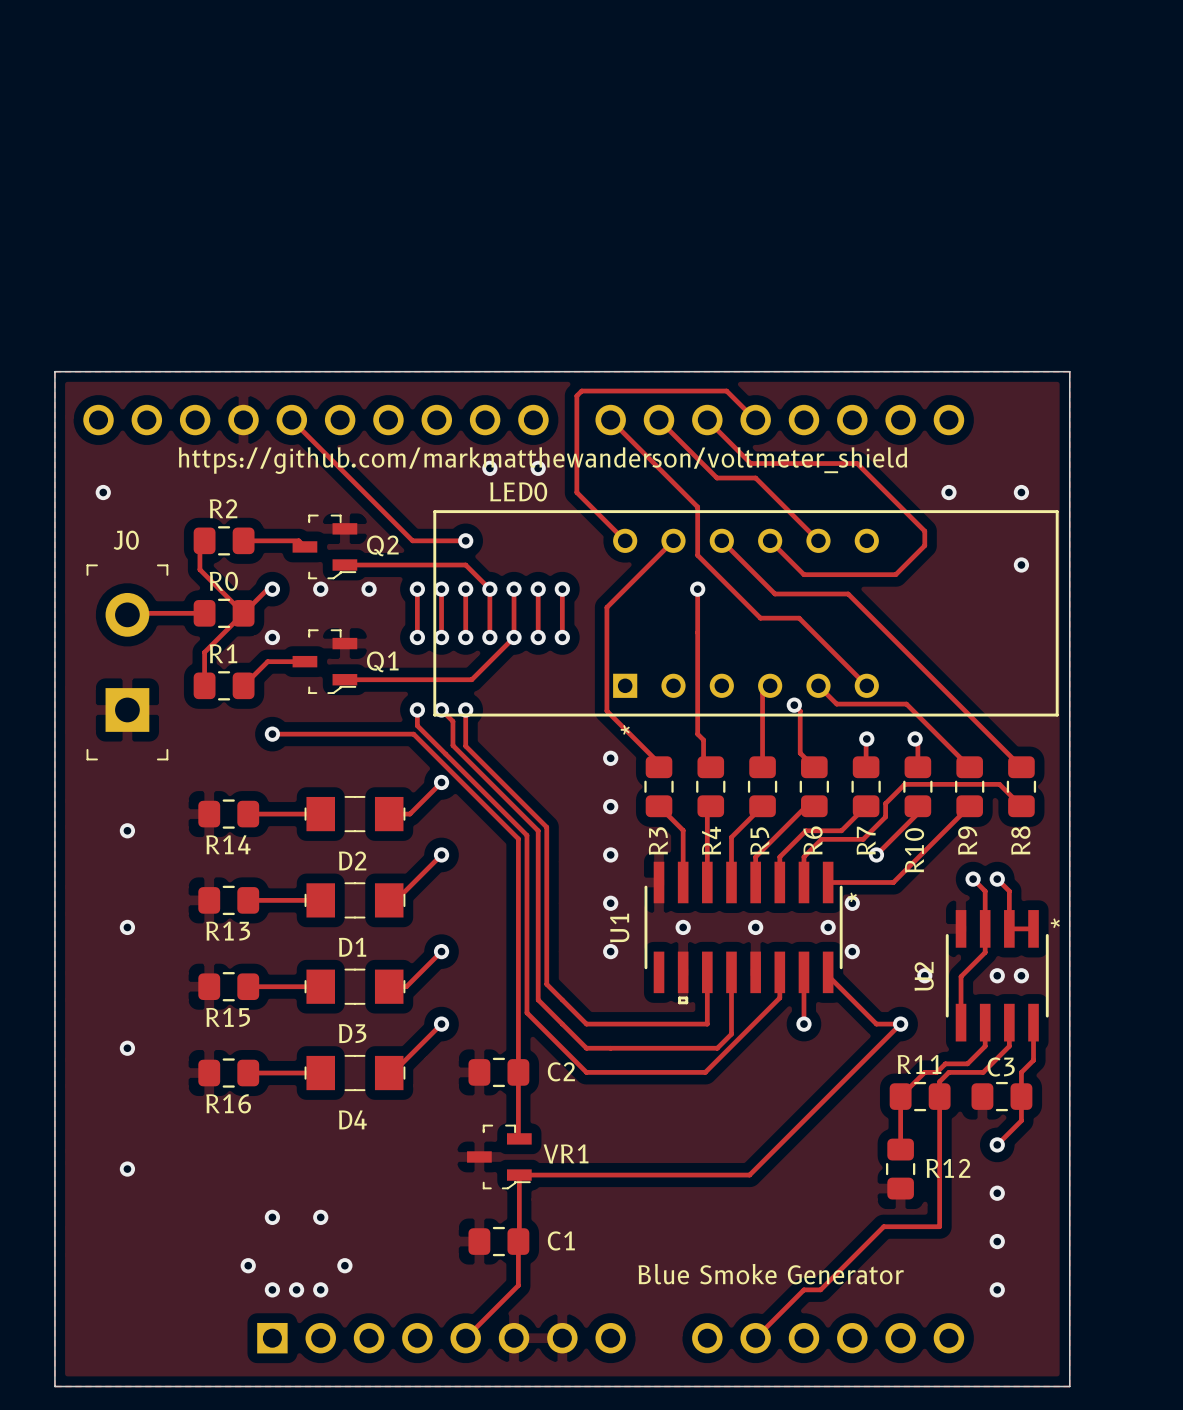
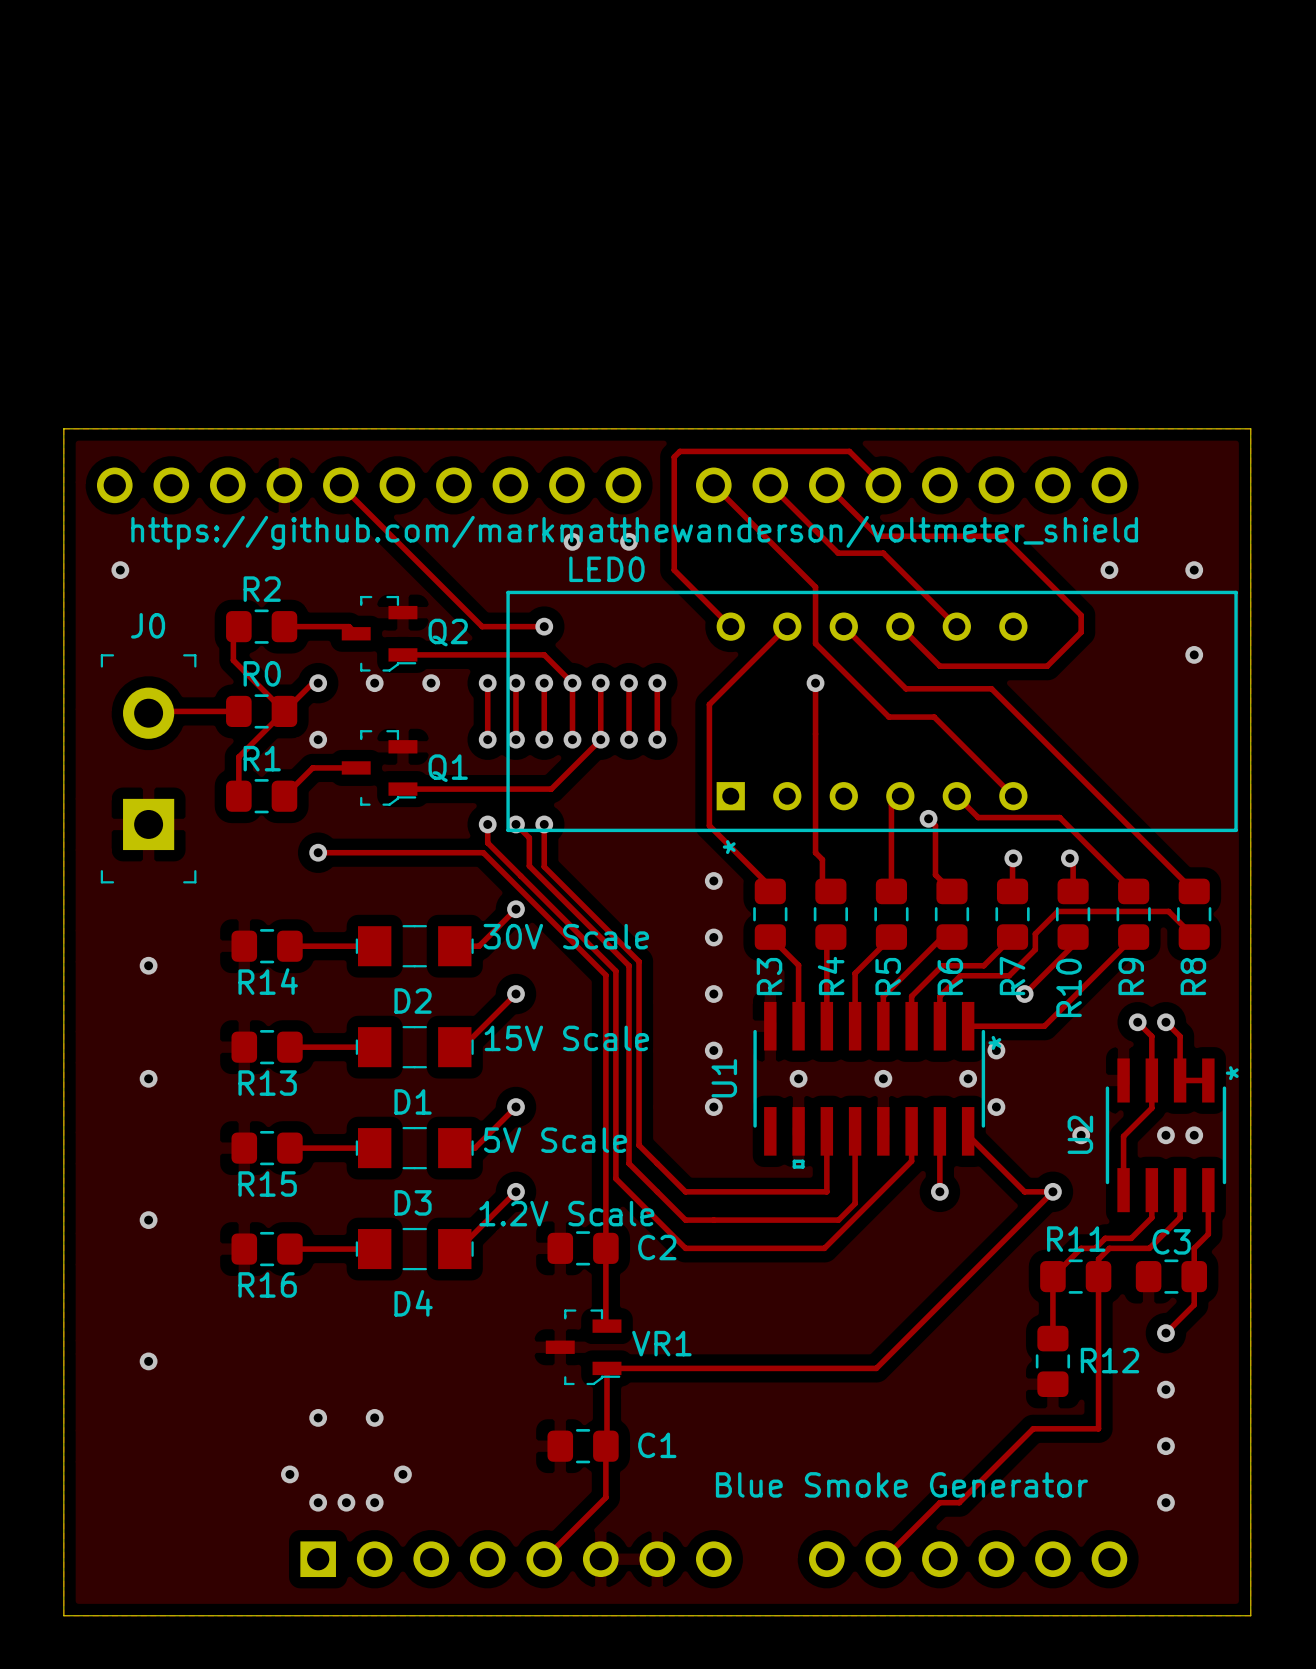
text: none -> 30V Scale (566, 936)
text: none -> 15V Scale (566, 1038)
text: none -> 5V Scale (555, 1140)
text: none -> 1.2V Scale (566, 1213)

